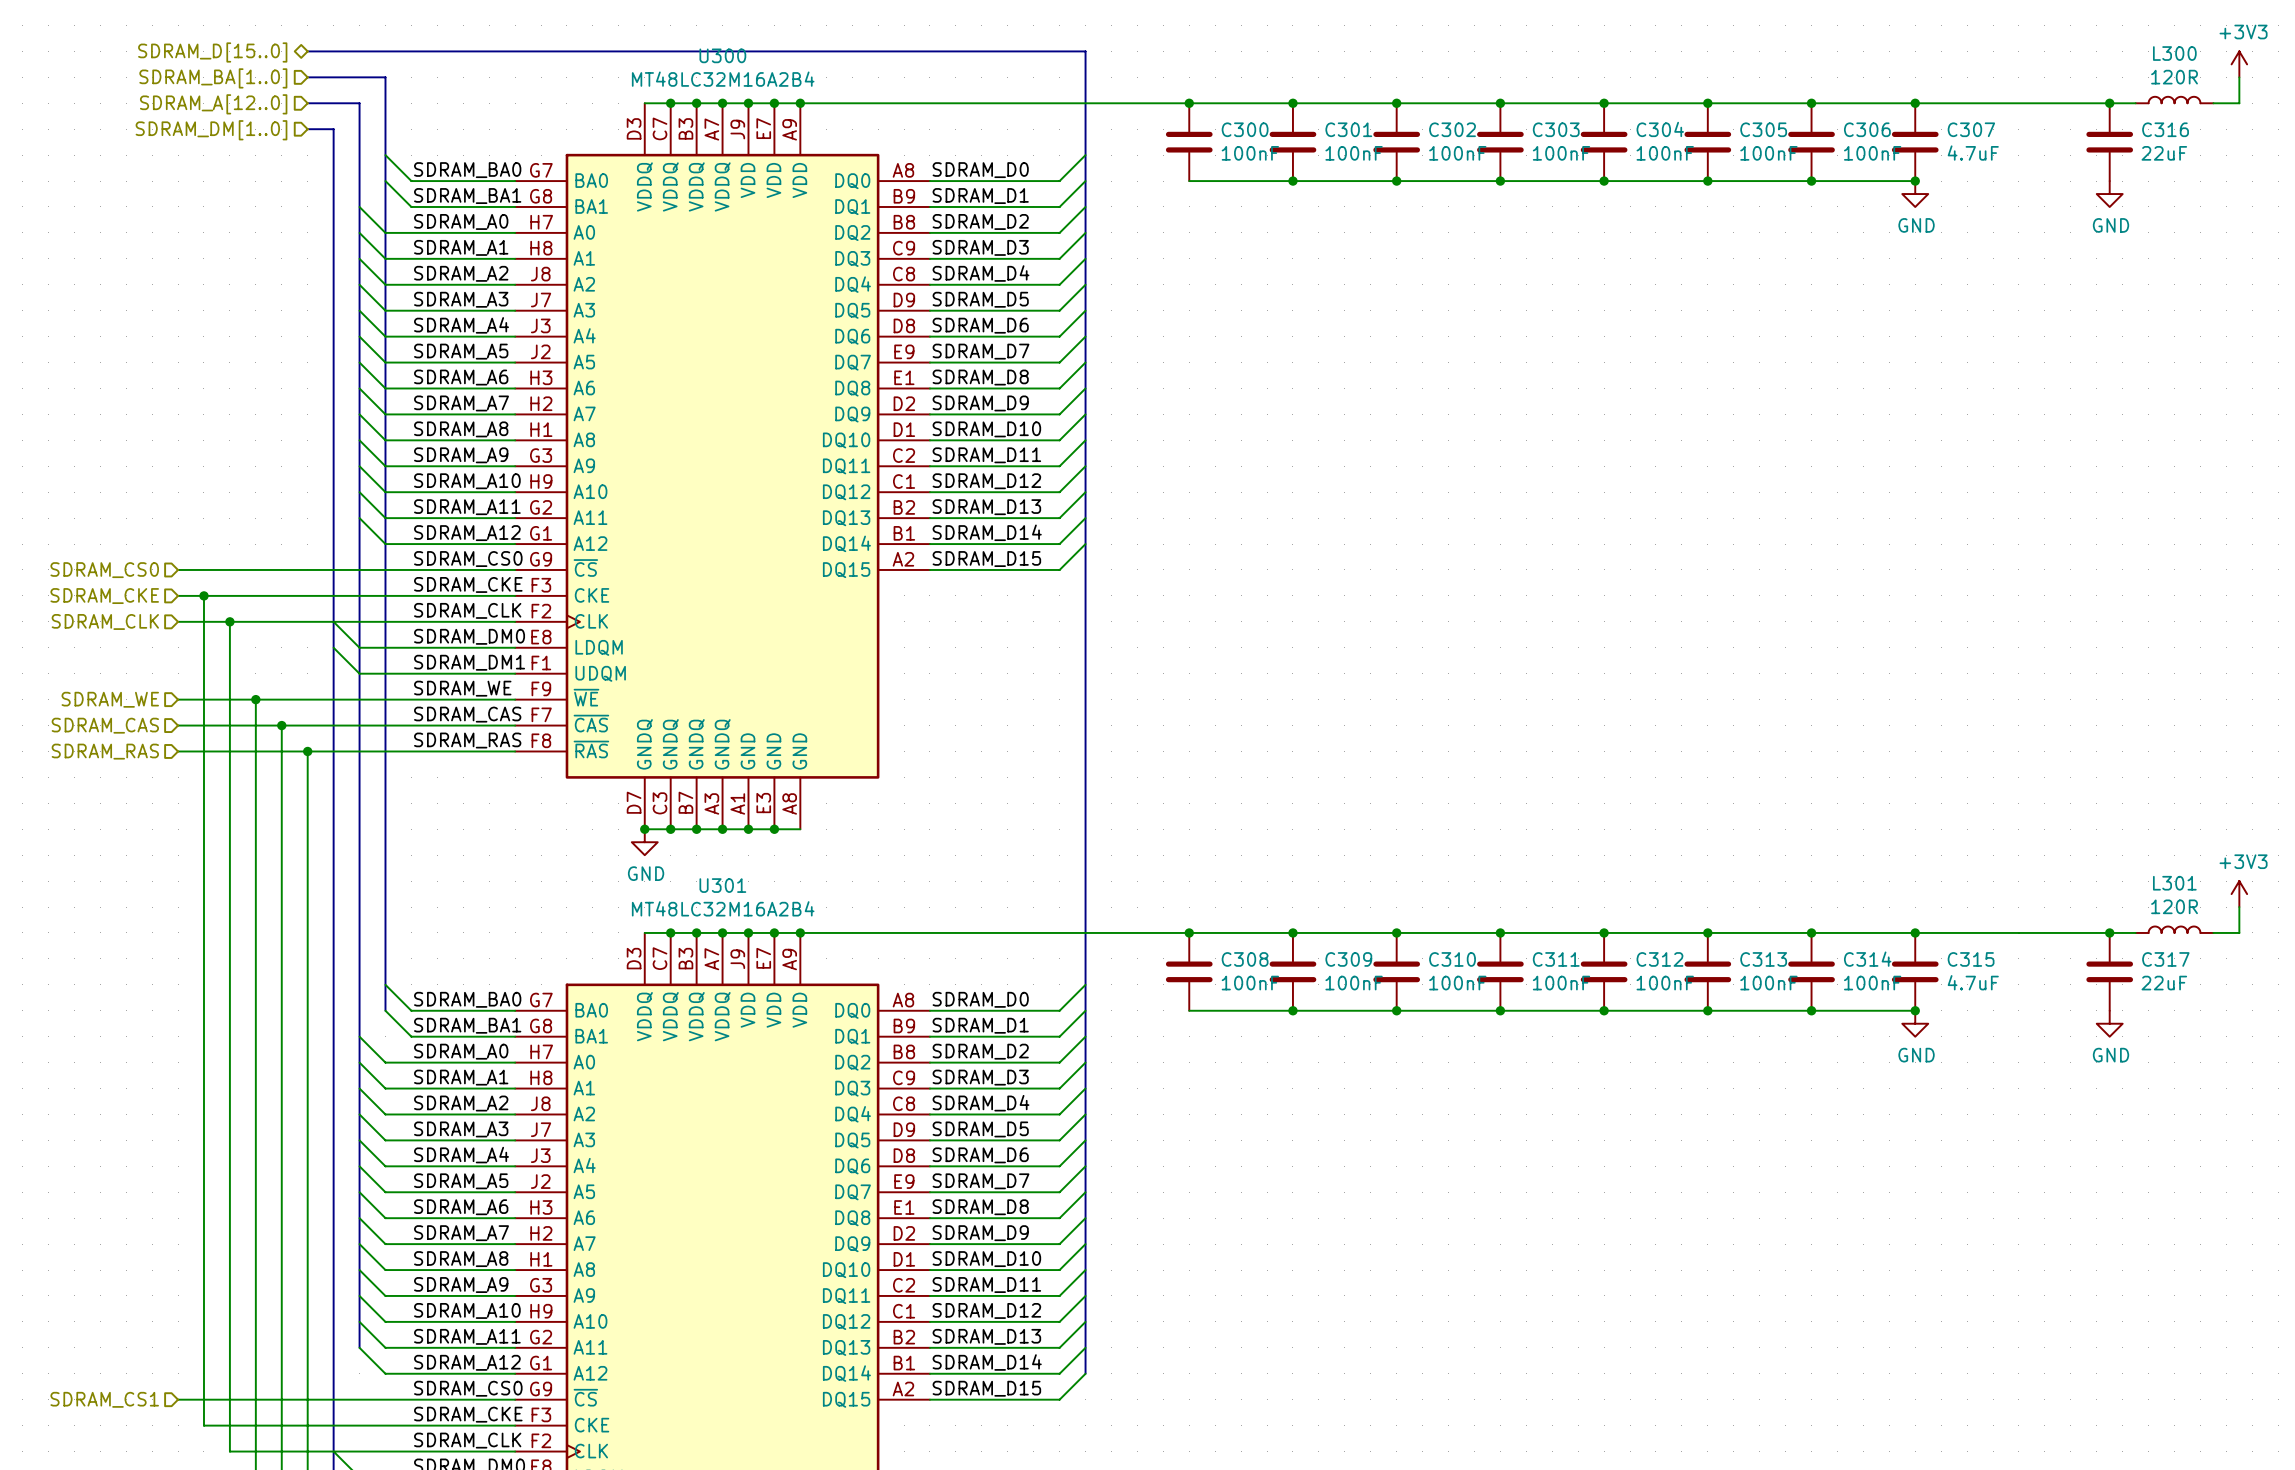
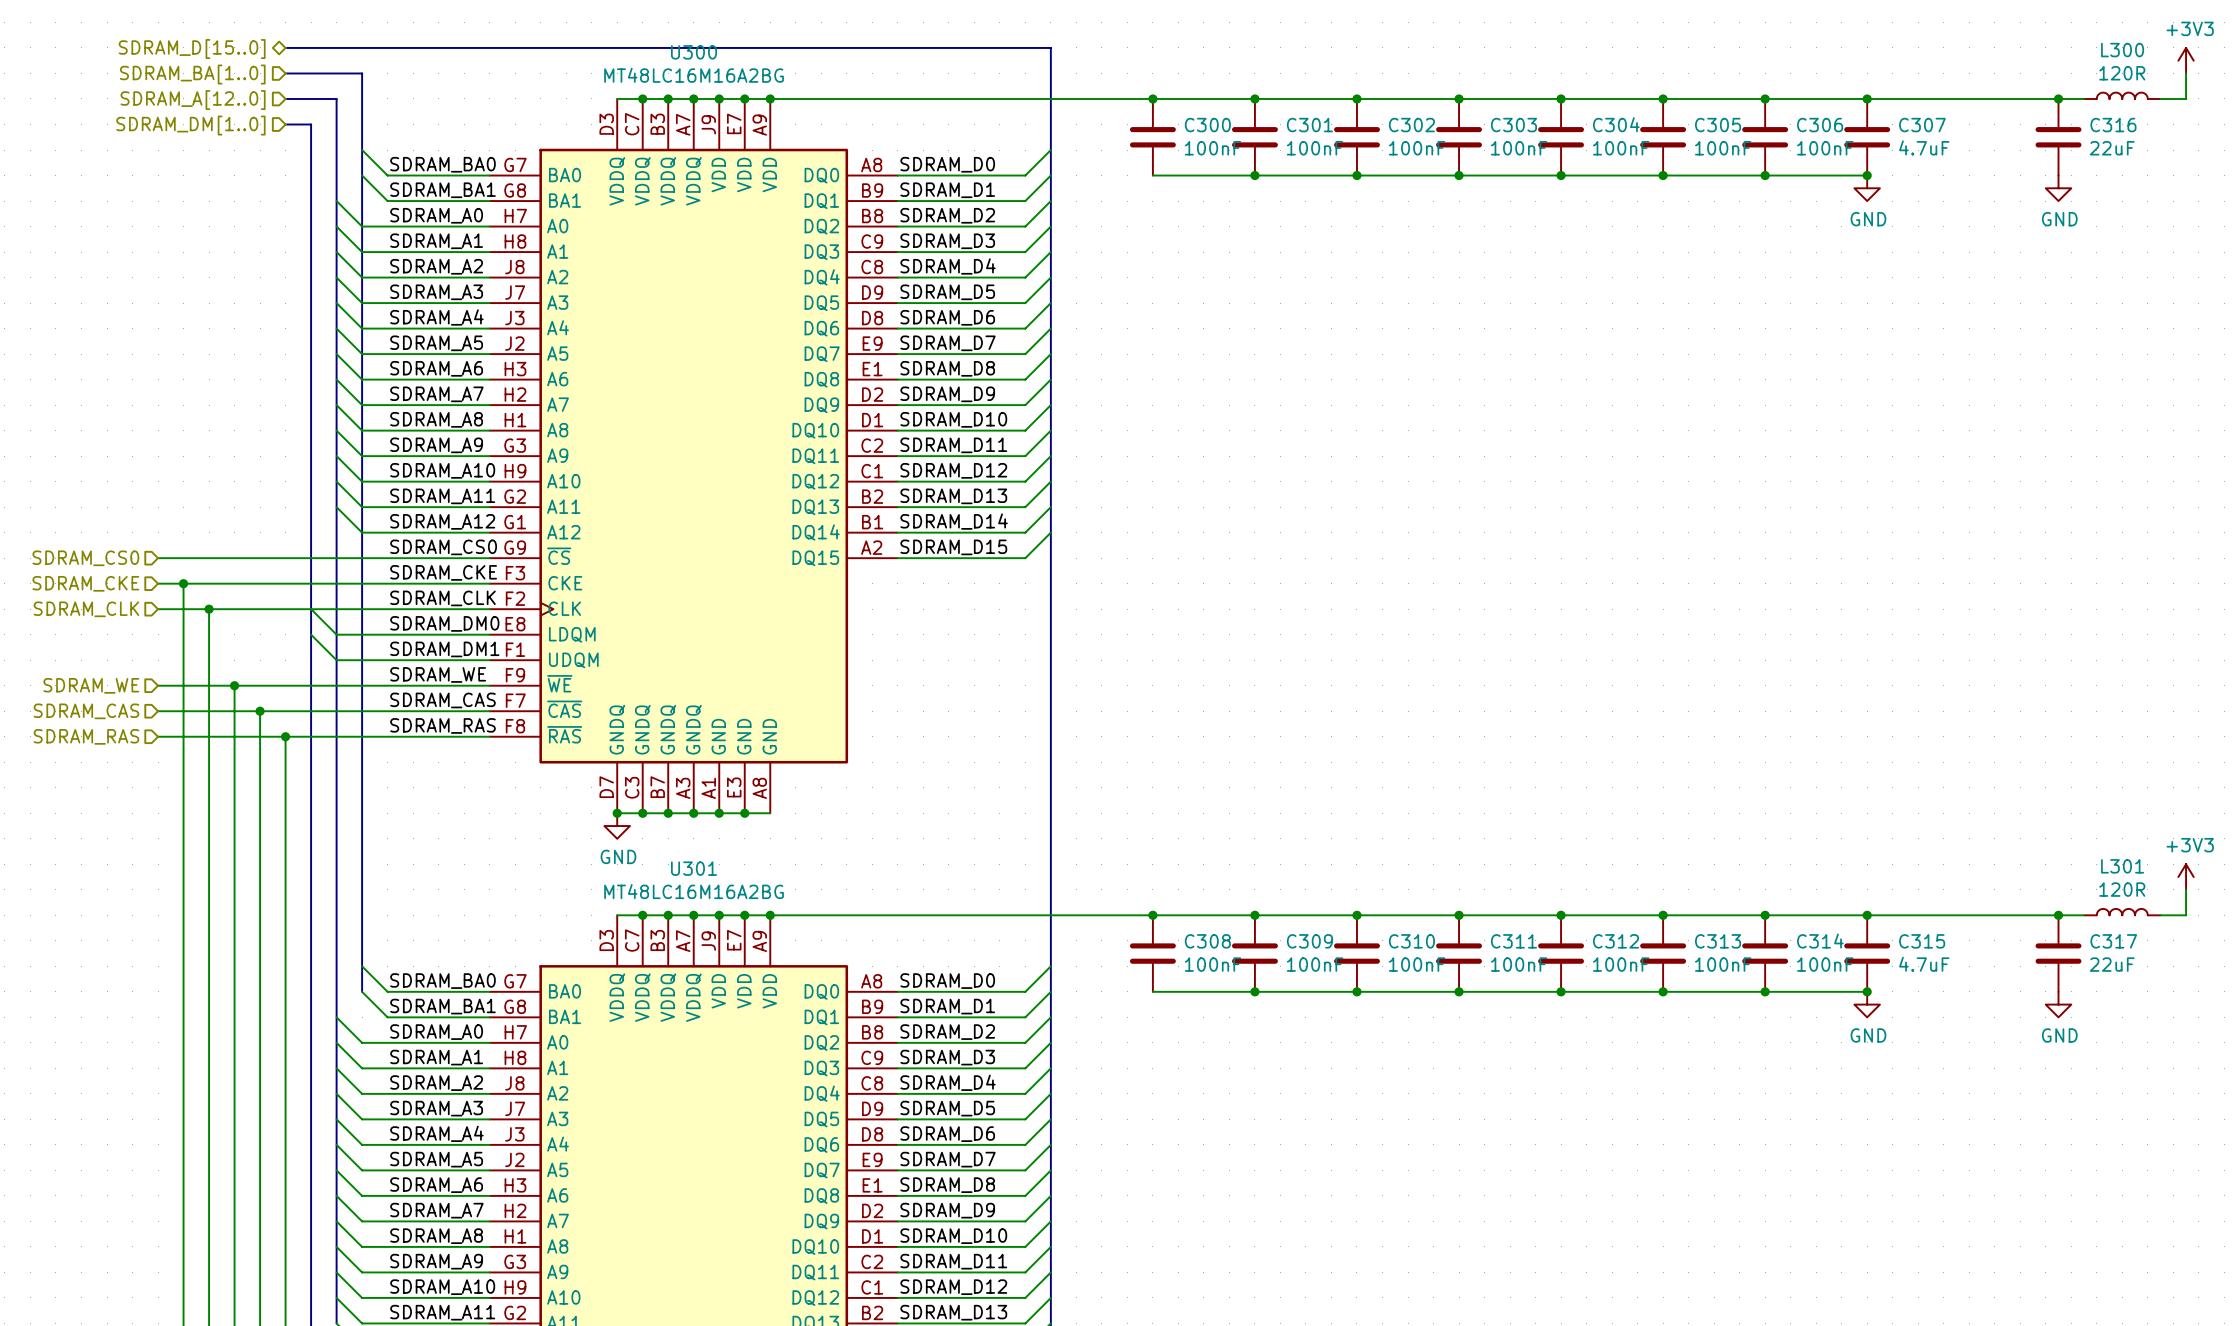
U300 value: MT48LC32M16A2B4 (723, 79) -> MT48LC16M16A2BG (694, 75)
U301 value: MT48LC32M16A2B4 (723, 908) -> MT48LC16M16A2BG (694, 891)

